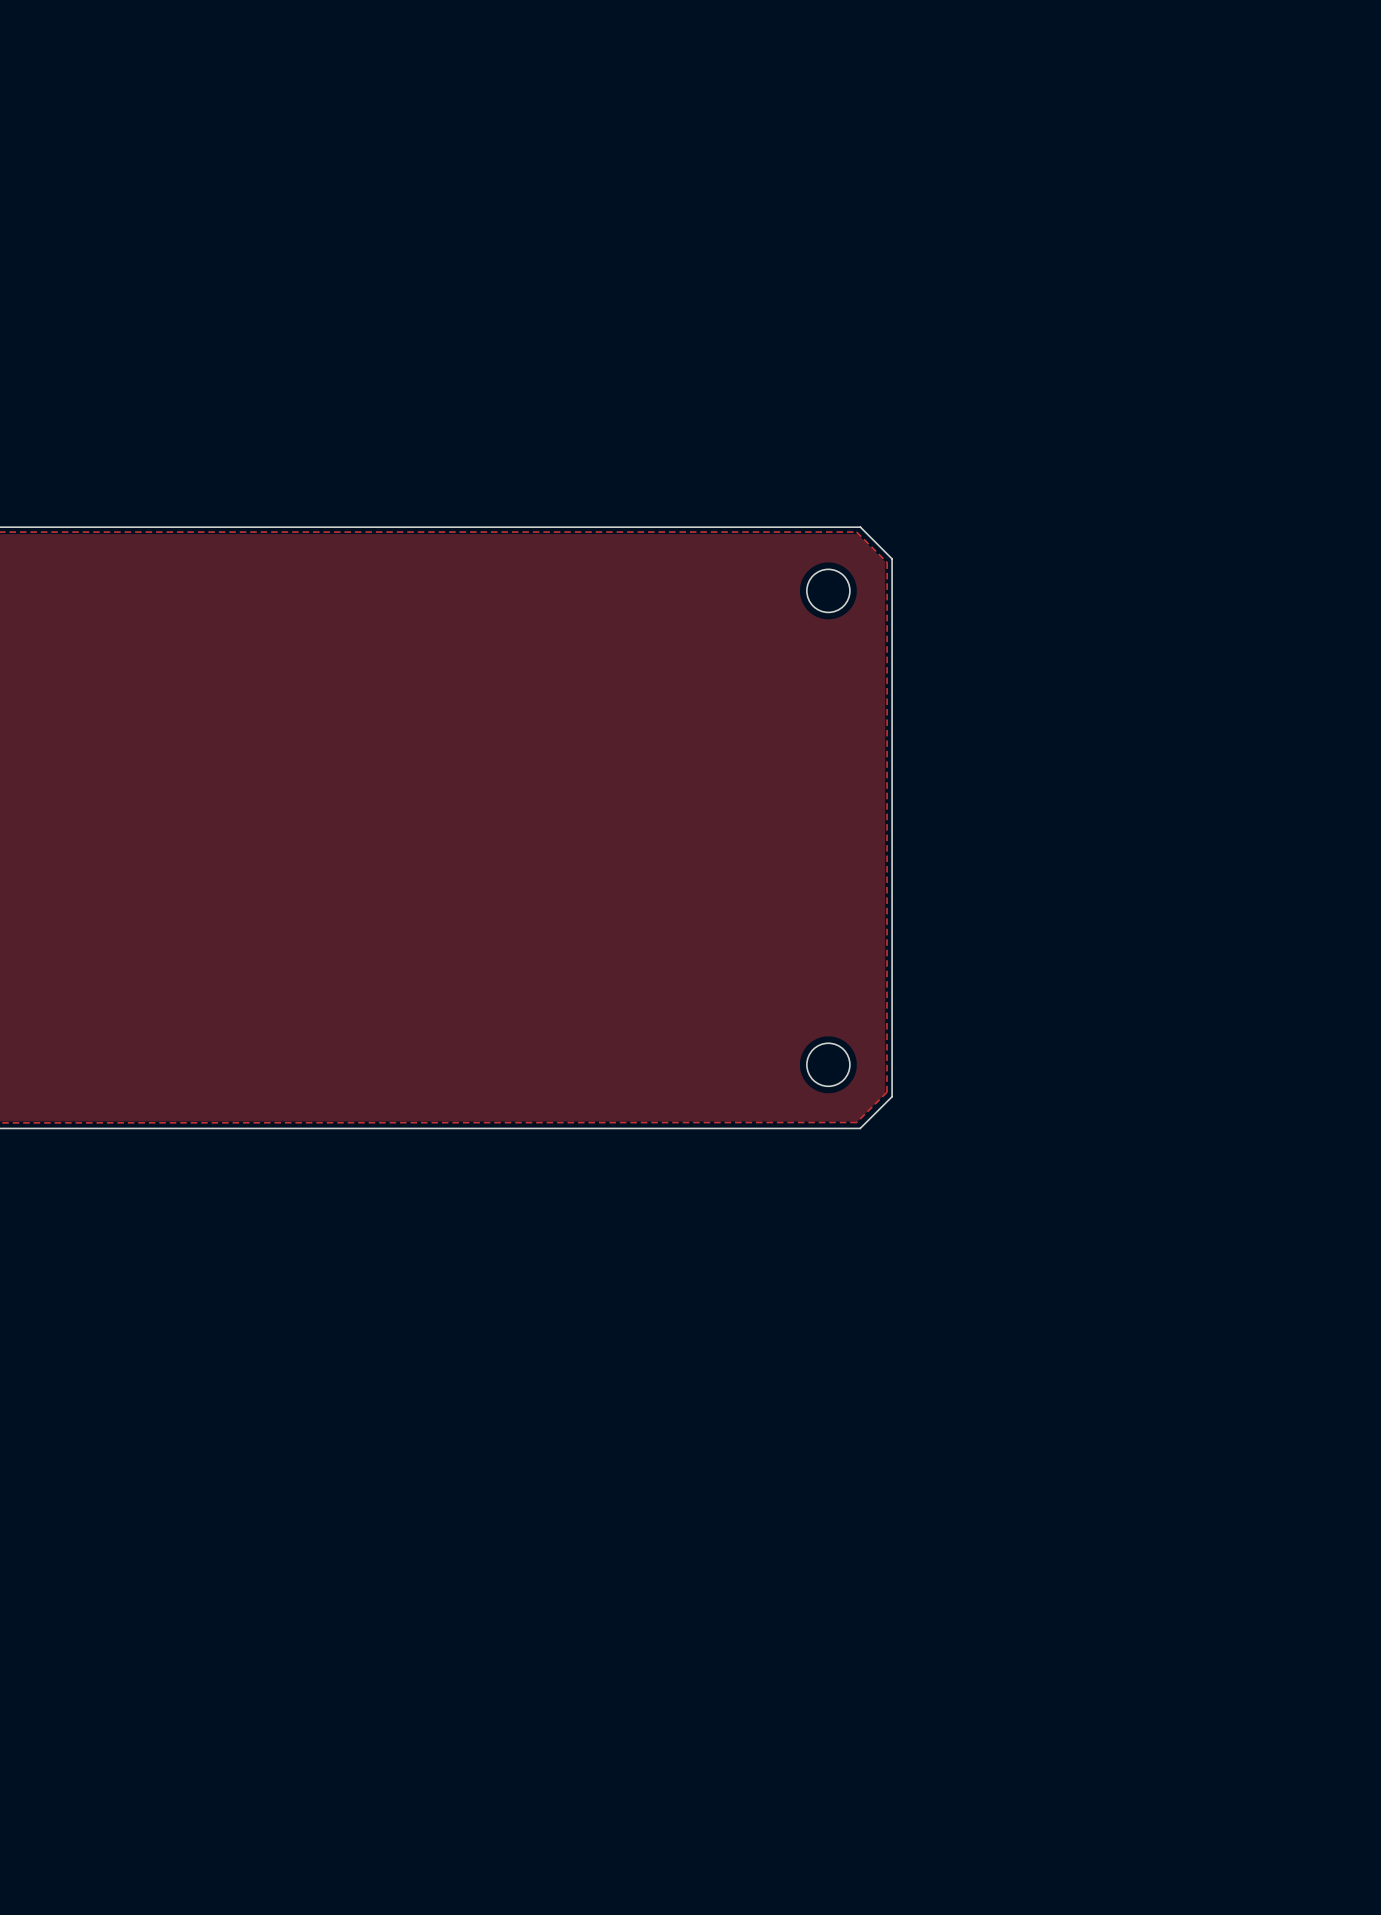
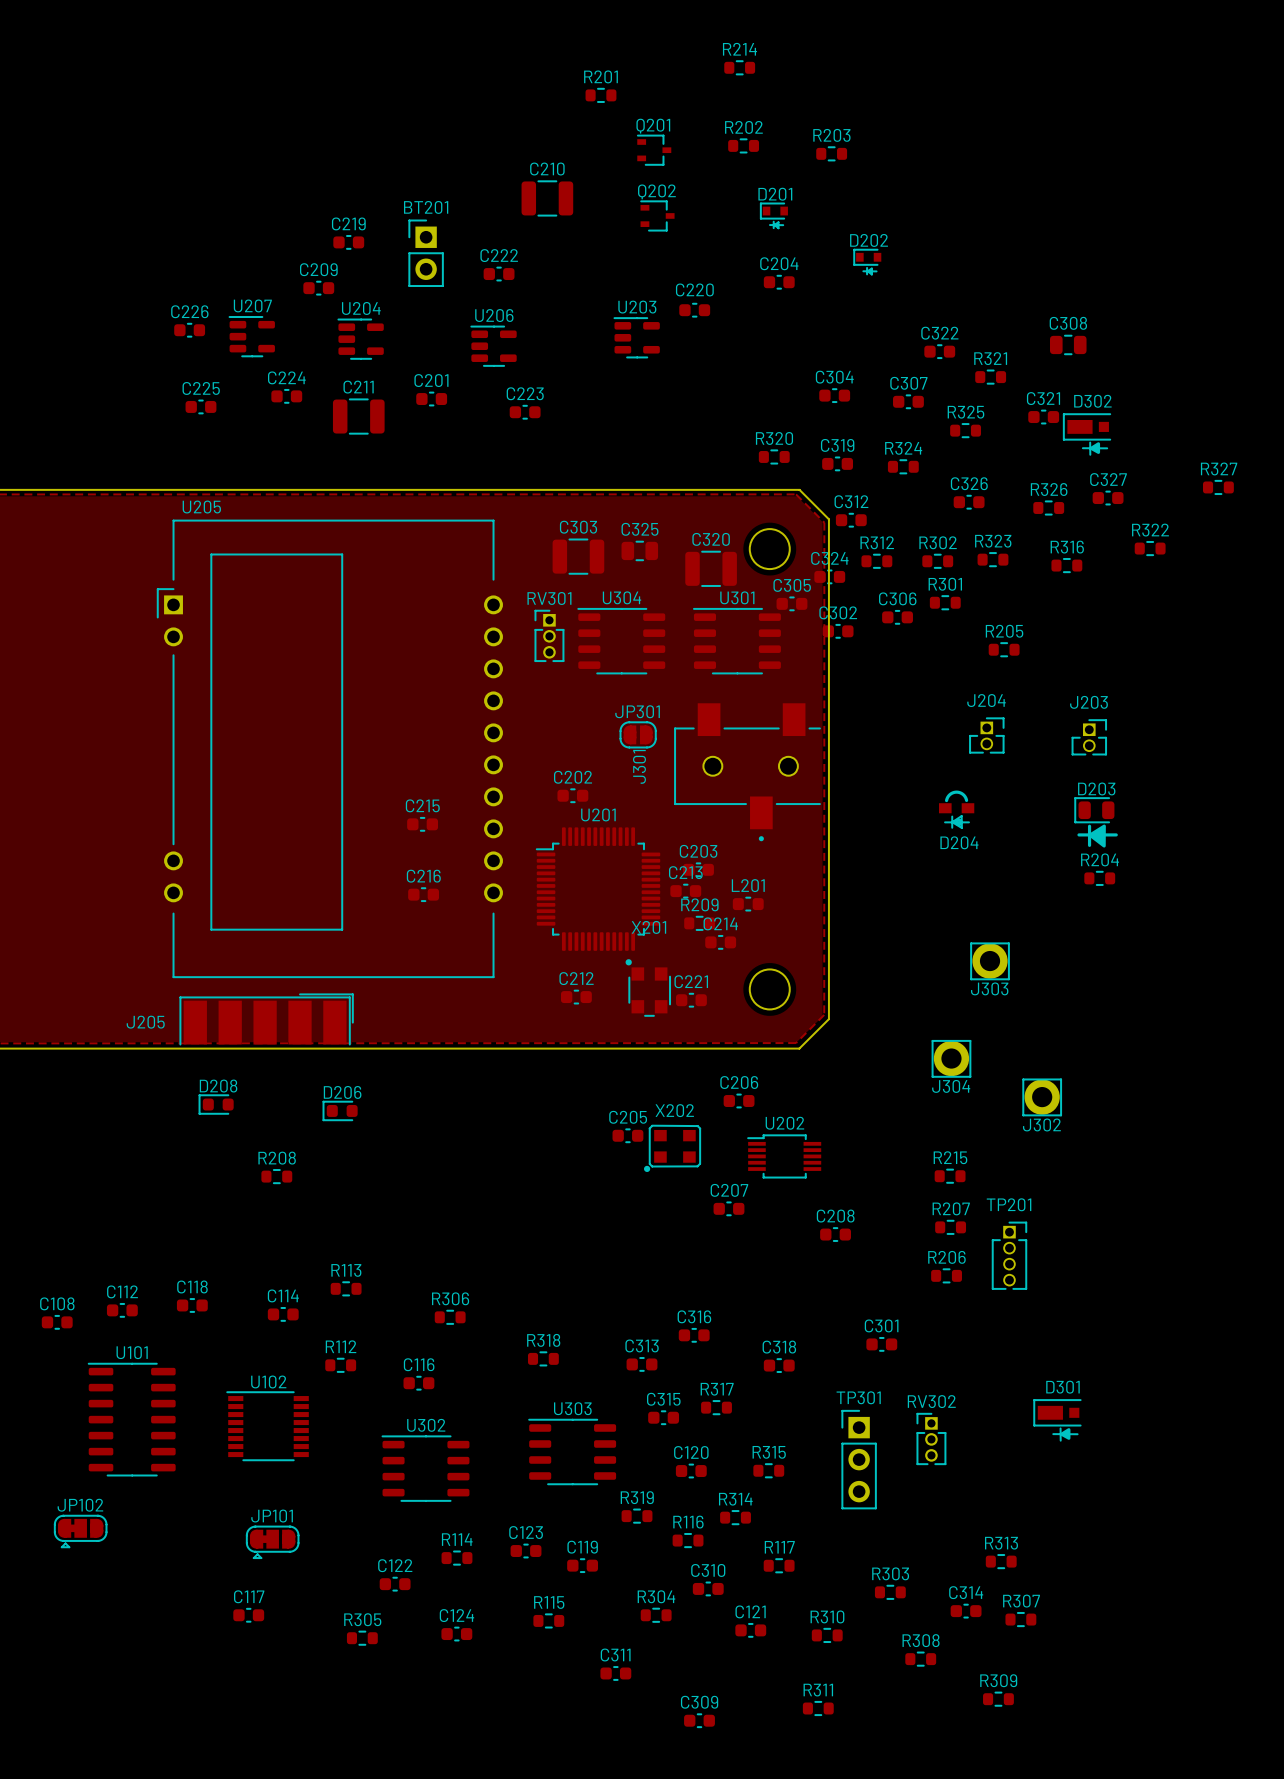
R214: none -> (739, 67)
R201: none -> (600, 95)
R202: none -> (743, 145)
Q201: none -> (654, 150)
R203: none -> (831, 153)
C210: none -> (547, 198)
Q202: none -> (657, 215)
D201: none -> (774, 215)
C219: none -> (348, 242)
BT201: none -> (426, 253)
D202: none -> (867, 262)
C222: none -> (499, 274)
C204: none -> (779, 282)
C209: none -> (318, 288)
C220: none -> (694, 310)
C226: none -> (189, 330)
U207: none -> (251, 336)
U203: none -> (636, 337)
U204: none -> (360, 339)
C308: none -> (1068, 344)
U206: none -> (493, 346)
C322: none -> (939, 351)
R321: none -> (990, 377)
C304: none -> (834, 395)
C224: none -> (286, 396)
C201: none -> (431, 399)
C307: none -> (908, 401)
C225: none -> (200, 406)
C223: none -> (525, 412)
C211: none -> (358, 416)
C321: none -> (1043, 417)
R325: none -> (965, 430)
D302: none -> (1087, 434)
R320: none -> (774, 456)
C319: none -> (837, 463)
R324: none -> (903, 466)
R327: none -> (1218, 487)
C327: none -> (1108, 498)
C326: none -> (969, 502)
R326: none -> (1048, 507)
C312: none -> (851, 520)
R322: none -> (1150, 548)
C325: none -> (639, 550)
C303: none -> (578, 556)
R323: none -> (992, 559)
R312: none -> (876, 561)
R302: none -> (937, 561)
R316: none -> (1066, 565)
C320: none -> (711, 568)
C324: none -> (829, 576)
R301: none -> (945, 602)
C305: none -> (791, 603)
C306: none -> (897, 617)
C302: none -> (838, 631)
RV301: none -> (549, 635)
U304: none -> (621, 641)
U301: none -> (737, 641)
R205: none -> (1004, 649)
JP301: none -> (638, 734)
J204: none -> (986, 735)
J203: none -> (1089, 737)
U205: none -> (329, 748)
J301: none -> (747, 772)
C202: none -> (572, 795)
D204: none -> (956, 809)
D203: none -> (1096, 822)
C215: none -> (422, 824)
C203: none -> (698, 869)
R204: none -> (1099, 878)
U201: none -> (598, 889)
C213: none -> (685, 891)
C216: none -> (423, 894)
L201: none -> (748, 904)
R209: none -> (699, 923)
C214: none -> (720, 942)
J303: none -> (990, 961)
X201: none -> (648, 987)
C212: none -> (576, 997)
C221: none -> (691, 1000)
J205: none -> (266, 1019)
J304: none -> (951, 1058)
J302: none -> (1042, 1097)
C206: none -> (739, 1101)
D208: none -> (216, 1104)
D206: none -> (340, 1110)
C205: none -> (627, 1135)
X202: none -> (672, 1148)
U202: none -> (784, 1156)
R215: none -> (950, 1176)
R208: none -> (276, 1176)
C207: none -> (728, 1208)
R207: none -> (950, 1227)
C208: none -> (835, 1234)
TP201: none -> (1009, 1255)
R206: none -> (946, 1275)
R113: none -> (346, 1288)
C118: none -> (192, 1305)
C112: none -> (122, 1310)
C114: none -> (283, 1314)
R306: none -> (450, 1317)
C108: none -> (57, 1322)
C316: none -> (694, 1335)
C301: none -> (881, 1344)
R318: none -> (543, 1358)
C313: none -> (641, 1364)
R112: none -> (340, 1365)
C318: none -> (779, 1365)
C116: none -> (418, 1383)
R317: none -> (716, 1407)
C315: none -> (663, 1417)
U101: none -> (131, 1419)
D301: none -> (1057, 1420)
U102: none -> (267, 1426)
RV302: none -> (931, 1438)
U303: none -> (572, 1451)
TP301: none -> (859, 1459)
U302: none -> (425, 1468)
R315: none -> (768, 1470)
C120: none -> (691, 1471)
R319: none -> (637, 1516)
R314: none -> (735, 1517)
JP102: none -> (80, 1531)
R116: none -> (688, 1540)
JP101: none -> (272, 1542)
C123: none -> (526, 1551)
R114: none -> (456, 1558)
R313: none -> (1001, 1561)
C119: none -> (582, 1565)
R117: none -> (779, 1565)
C122: none -> (395, 1584)
C310: none -> (708, 1588)
R303: none -> (890, 1592)
C314: none -> (966, 1611)
C117: none -> (248, 1615)
R304: none -> (656, 1615)
R307: none -> (1020, 1619)
R115: none -> (548, 1620)
C121: none -> (750, 1630)
C124: none -> (456, 1634)
R310: none -> (827, 1635)
R305: none -> (362, 1638)
R308: none -> (920, 1659)
C311: none -> (615, 1673)
R309: none -> (998, 1699)
R311: none -> (818, 1708)
C309: none -> (699, 1720)

